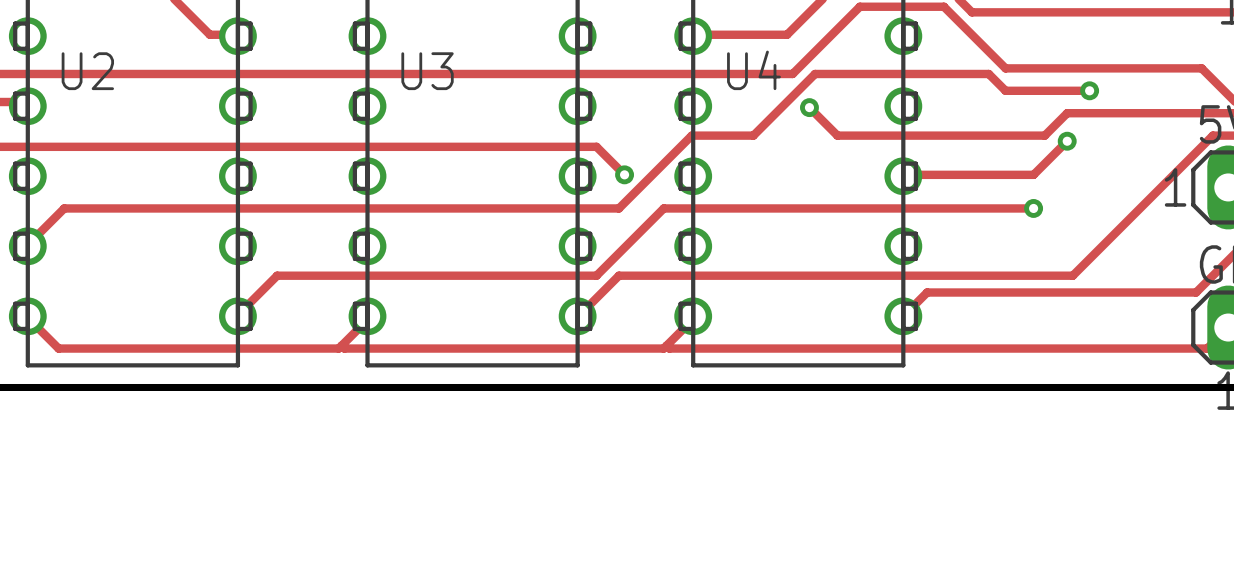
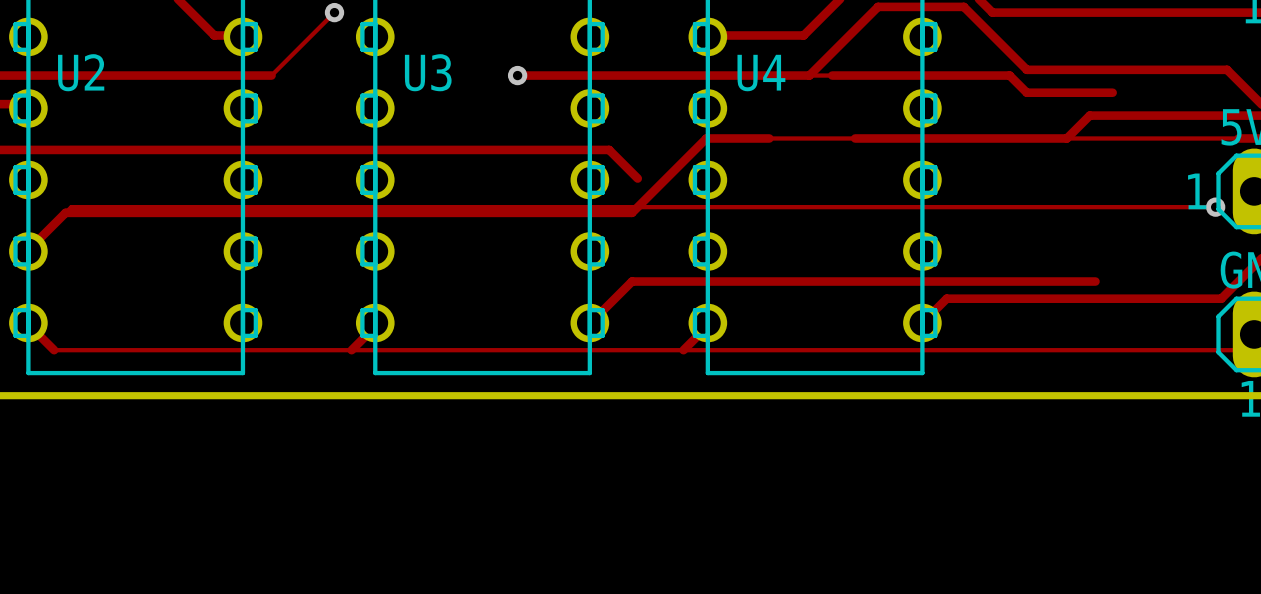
via: none -> (334, 12)
track: (265, 73) (506, 73) -> (271, 75) (334, 12)
via: none -> (517, 75)
track: (815, 73) (753, 135) -> (832, 75) (809, 75)
via: (1089, 90) -> none
track: (809, 107) (837, 135) -> (769, 138) (855, 138)
via: (809, 107) -> none
track: (1212, 135) (1072, 275) -> (1238, 138) (1066, 138)
track: (1067, 141) (1033, 174) (903, 176) -> none
via: (1067, 141) -> none
via: (624, 174) -> none
track: none -> (1215, 207) (71, 207) (65, 212)
via: none -> (1215, 207)
track: (1033, 208) (663, 208) (596, 275) (277, 275) (237, 316) -> none
via: (1033, 208) -> none
track: (53, 342) (58, 348) (338, 348) (344, 342) -> none
track: (669, 342) (663, 348) (344, 348) (341, 345) -> none
track: (1212, 342) (1207, 348) (669, 348) (666, 345) -> (1238, 350) (54, 350)

